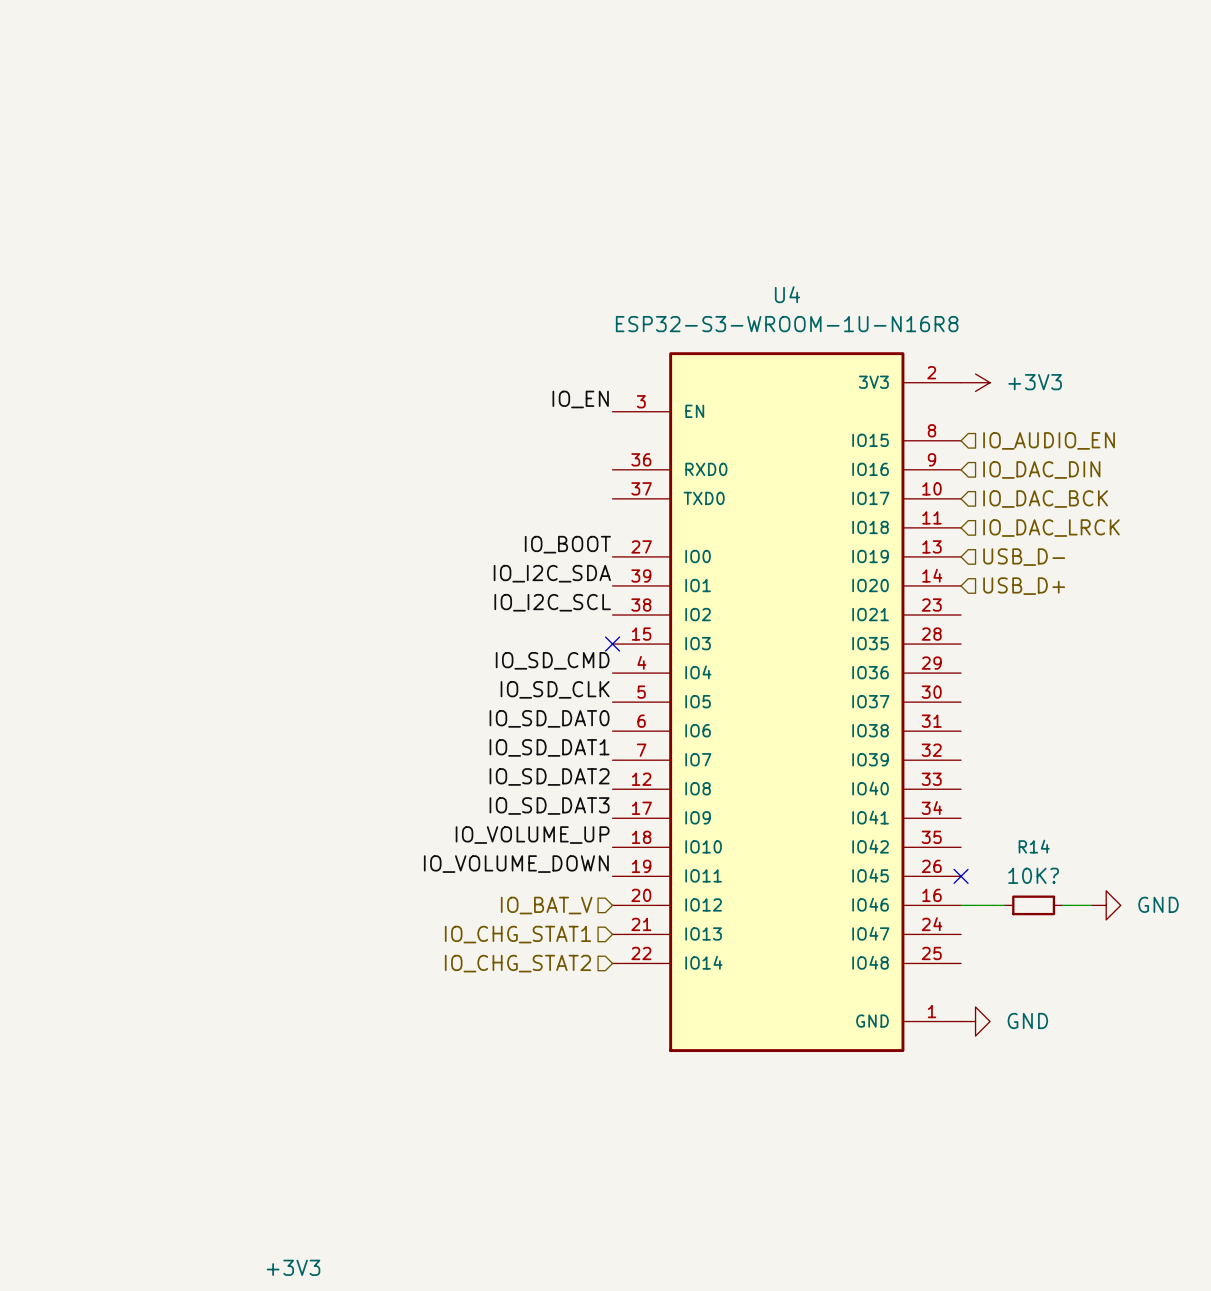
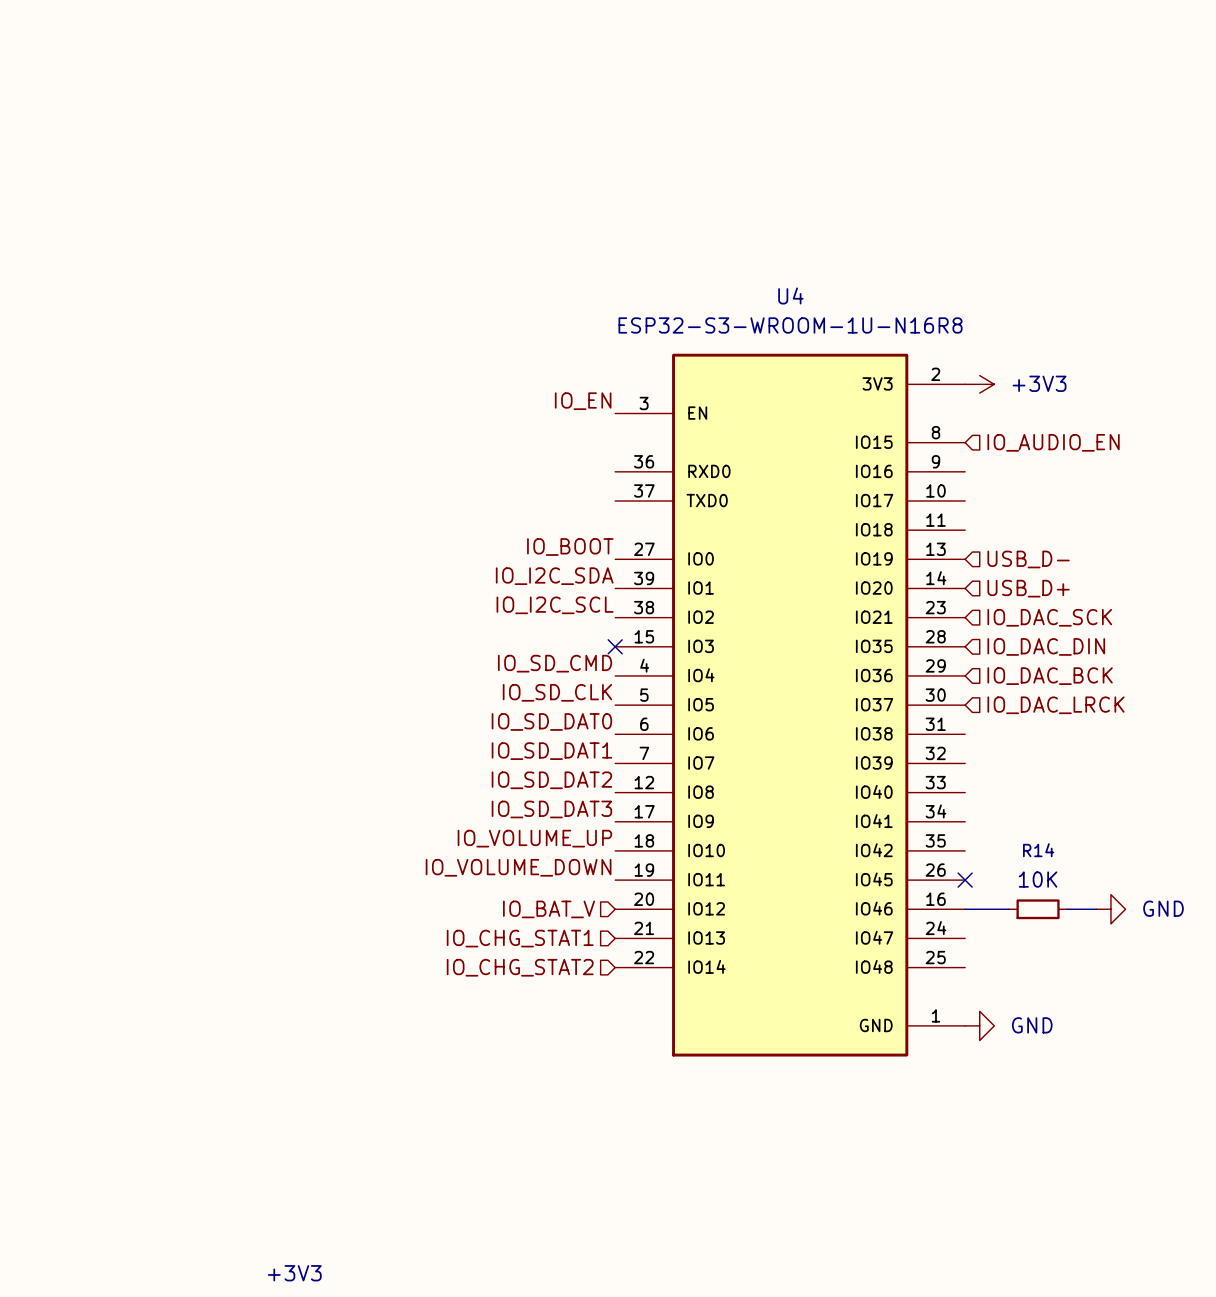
hierarchical label position: IO_DAC_DIN (1041, 469) -> IO_DAC_DIN (1046, 646)
hierarchical label position: IO_DAC_BCK (1045, 499) -> IO_DAC_BCK (1050, 676)
hierarchical label position: IO_DAC_LRCK (1051, 528) -> IO_DAC_LRCK (1055, 705)
hierarchical label: none -> IO_DAC_SCK (1049, 617)
R14 value: 10K? (1033, 875) -> 10K (1038, 879)

